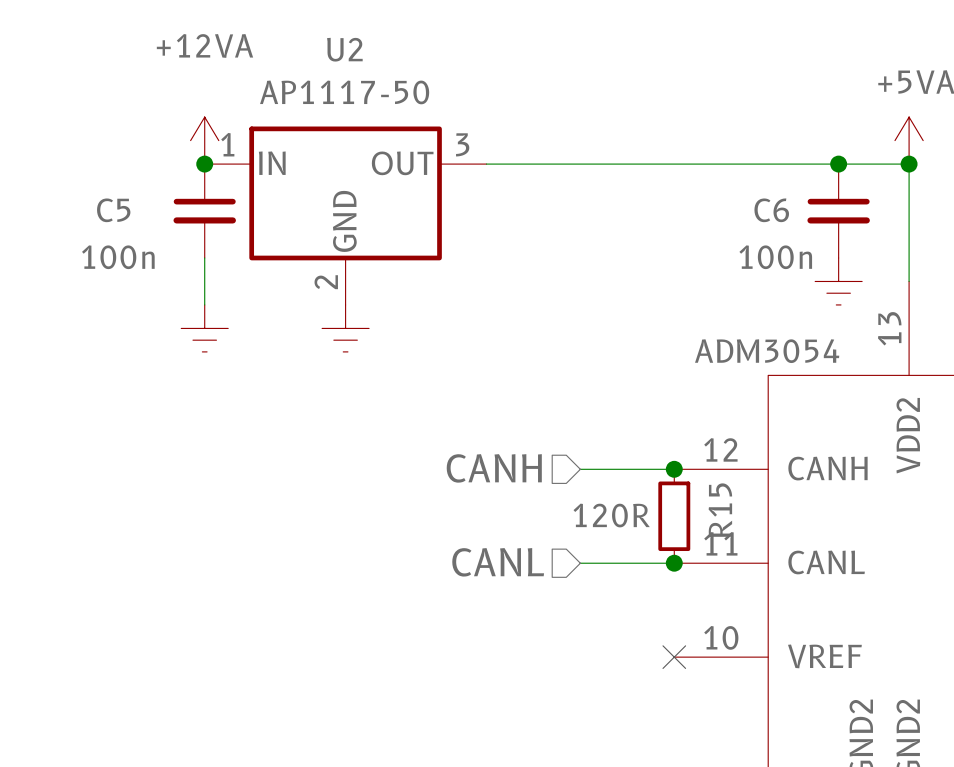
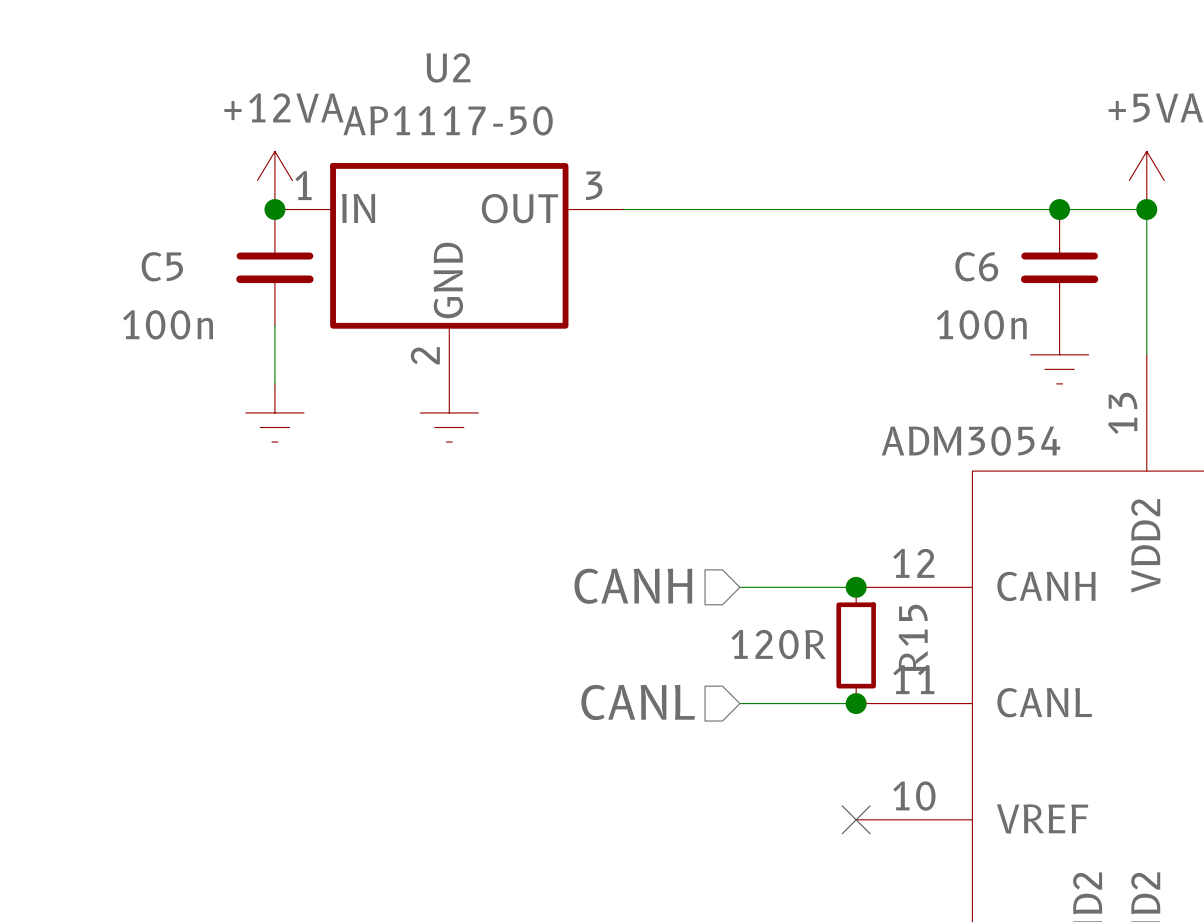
power symbol text position: +12VA (204, 45) -> +12VA (283, 108)

